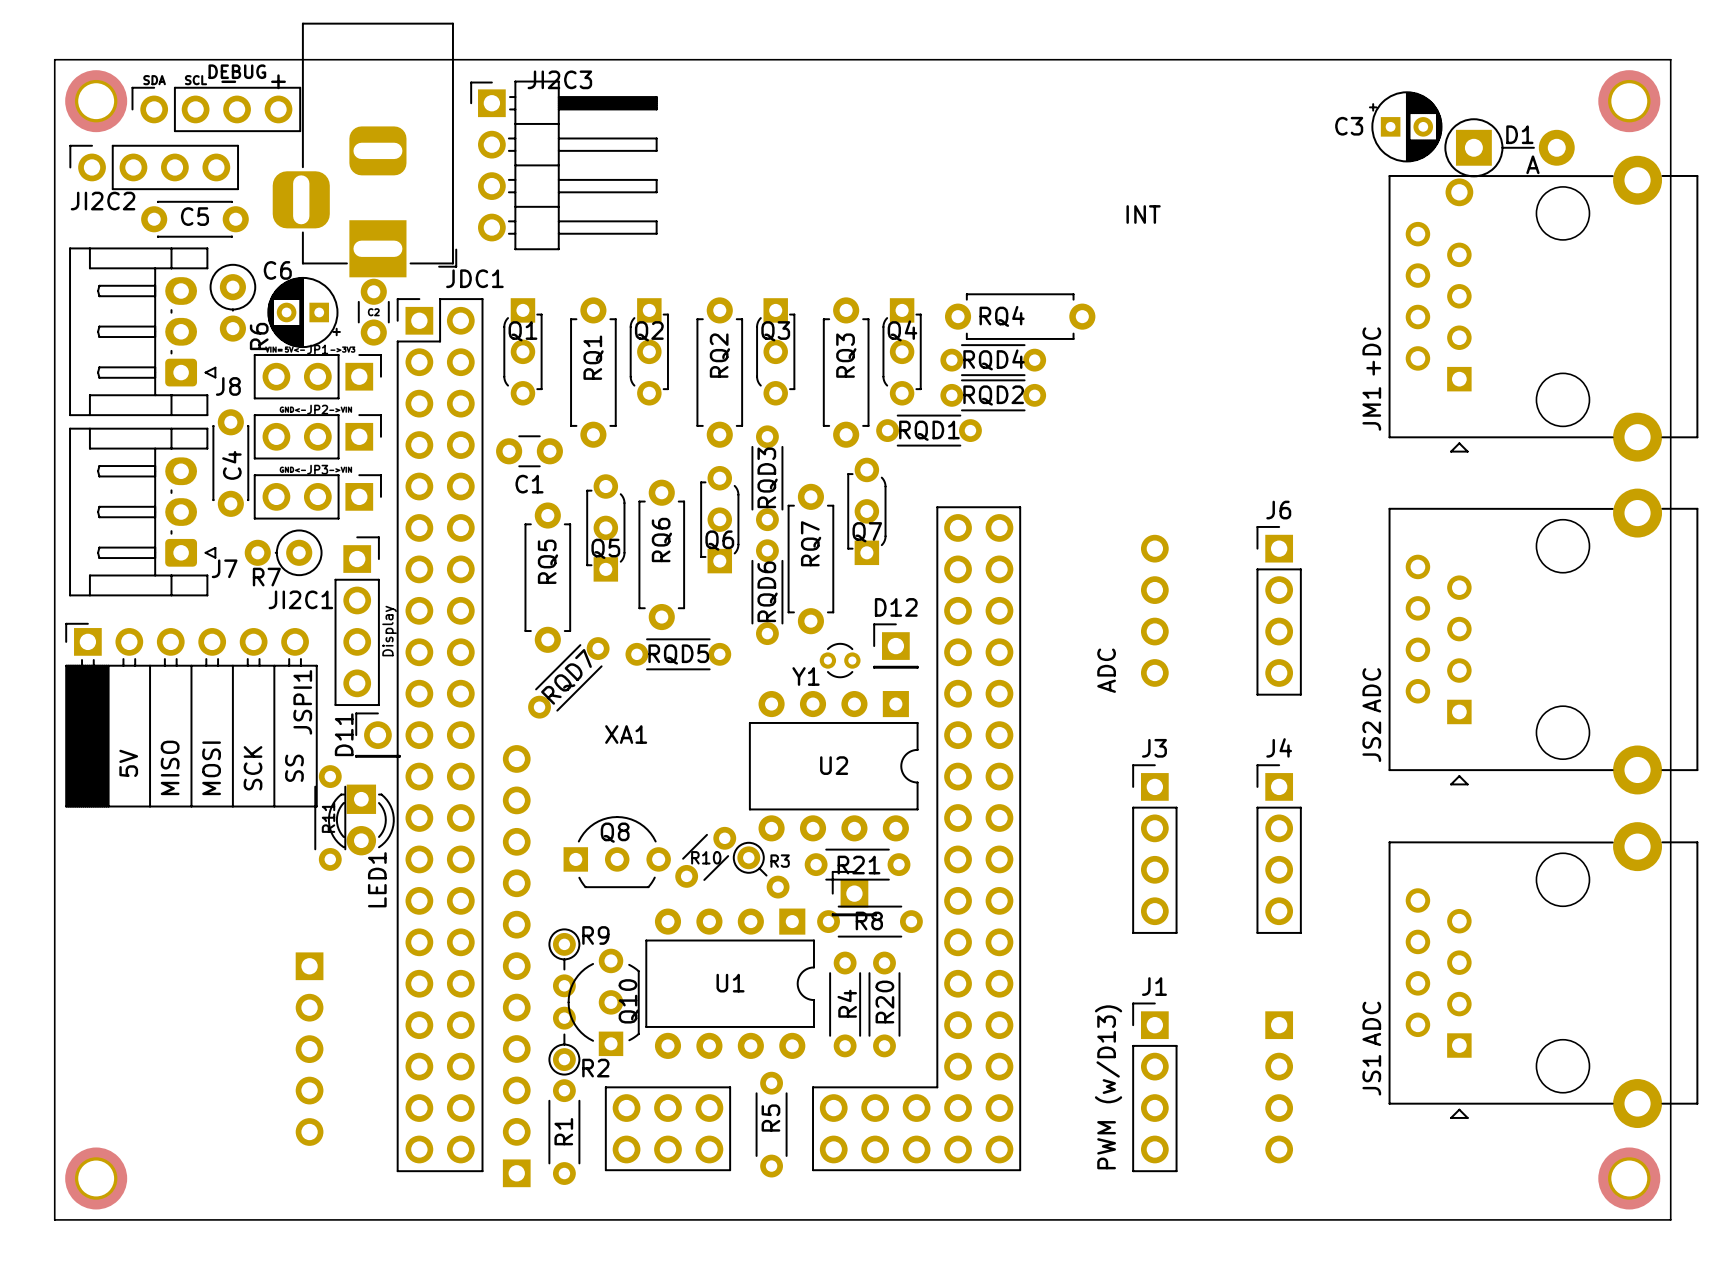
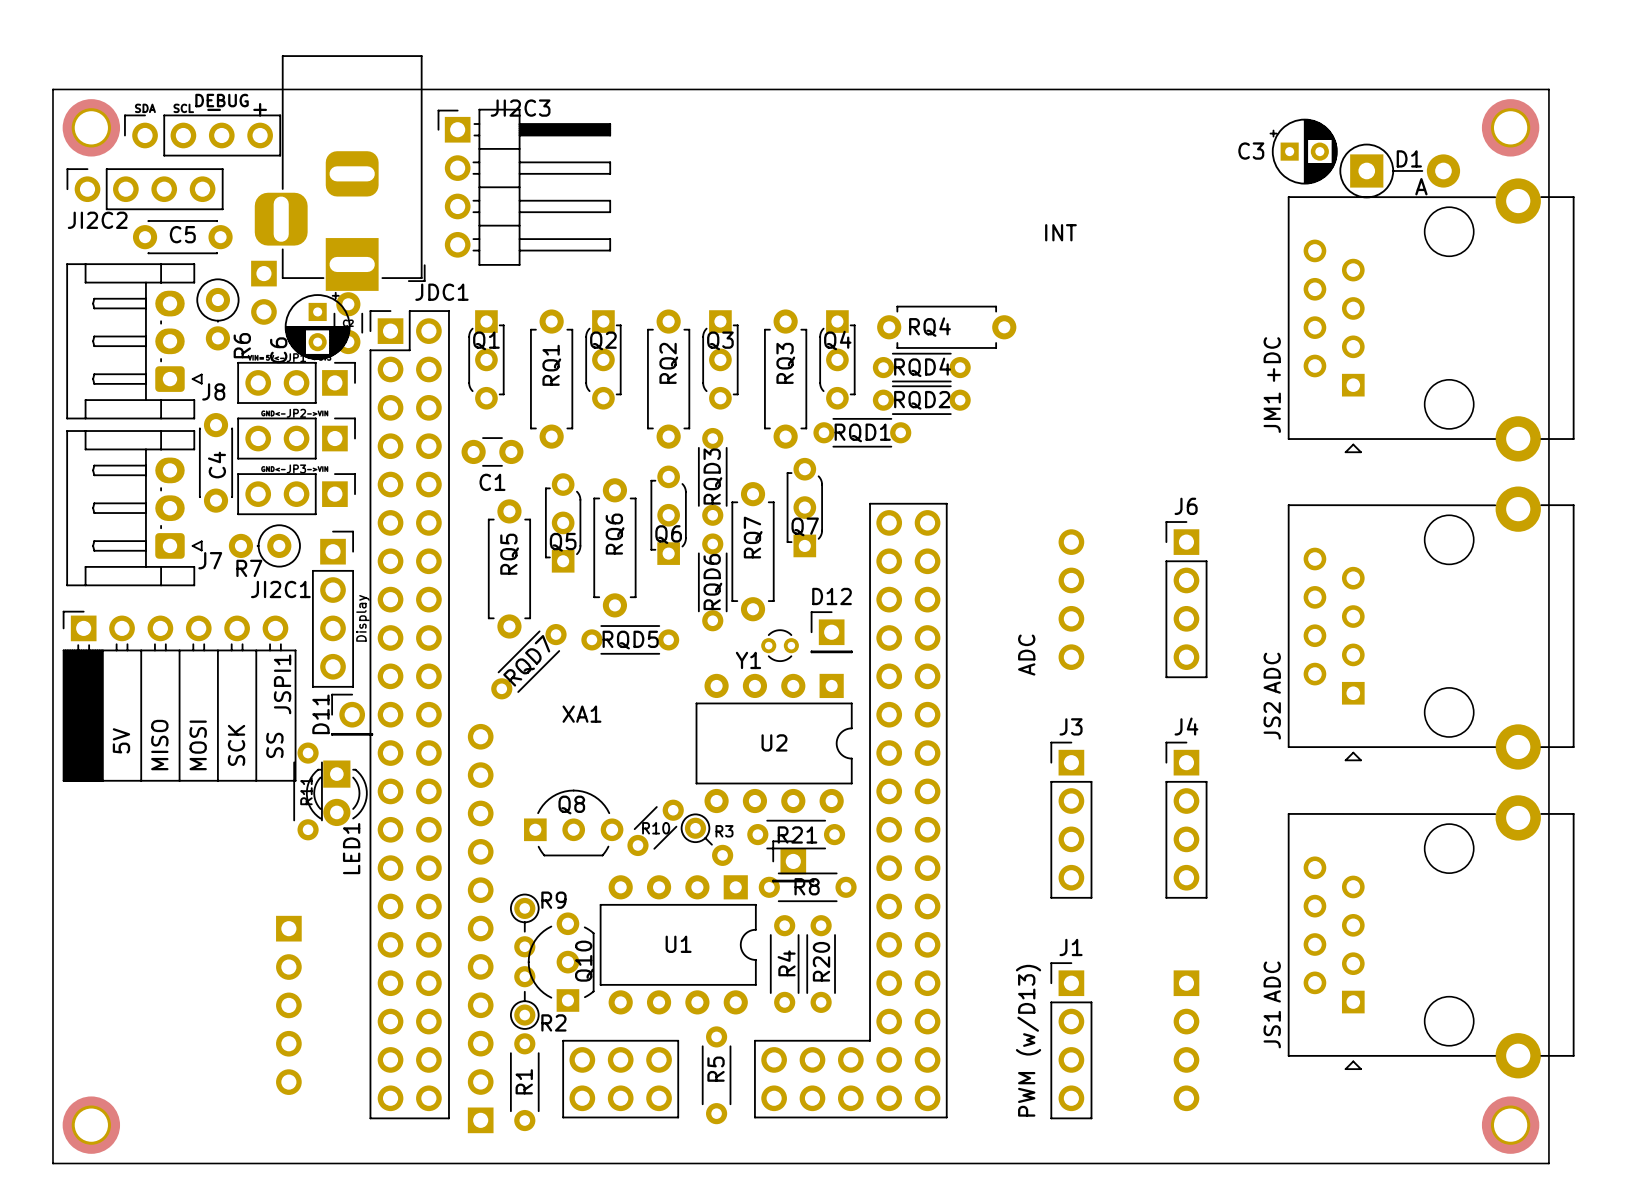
part: (1459, 192) -> none
part: none -> (263, 292)
C6 rotation: 0° (304, 312) -> 90° counterclockwise (317, 325)

